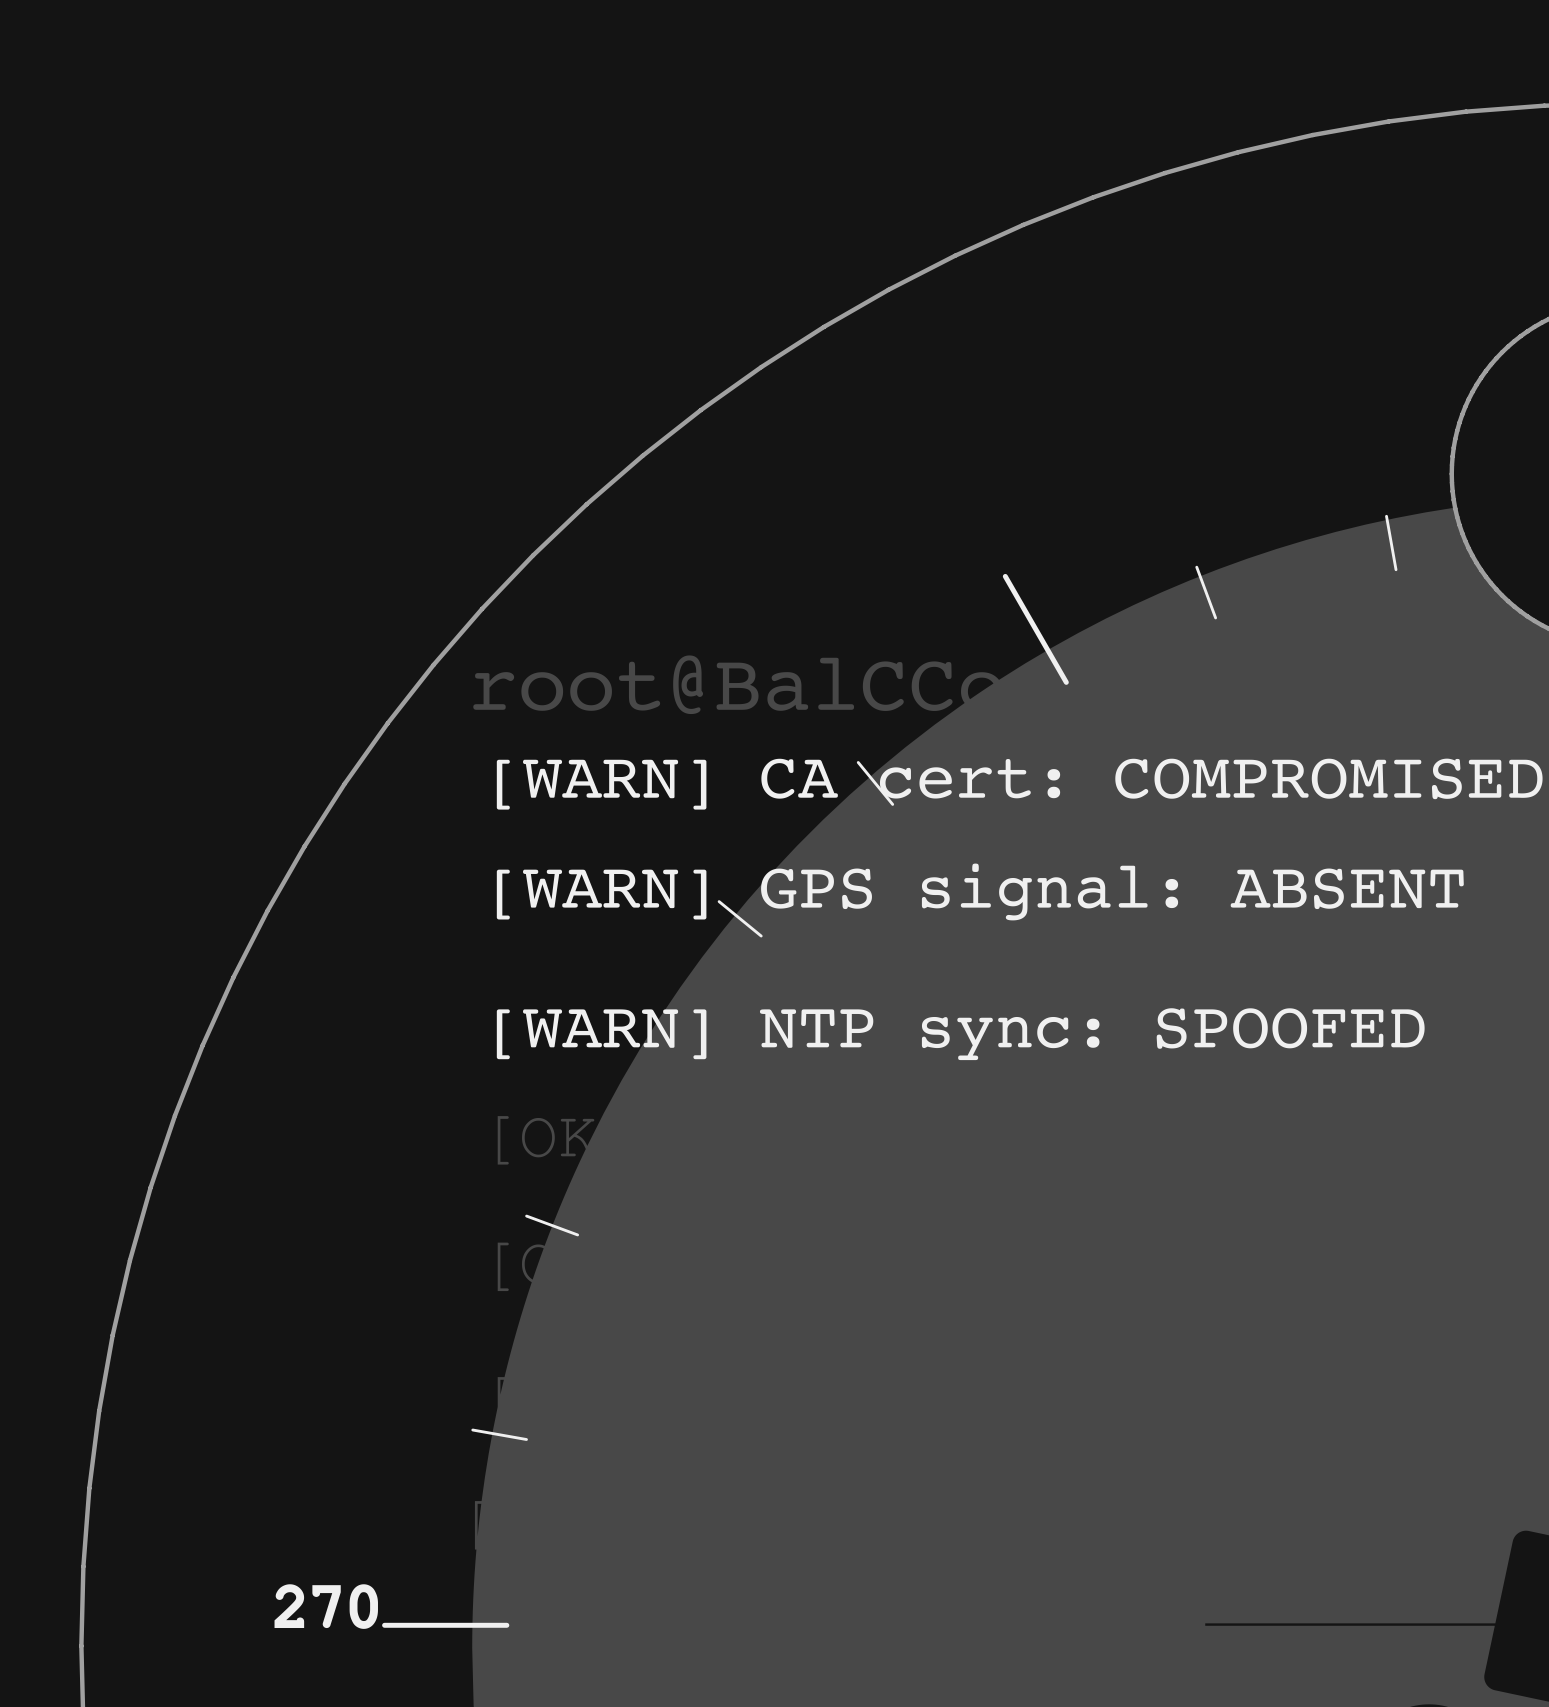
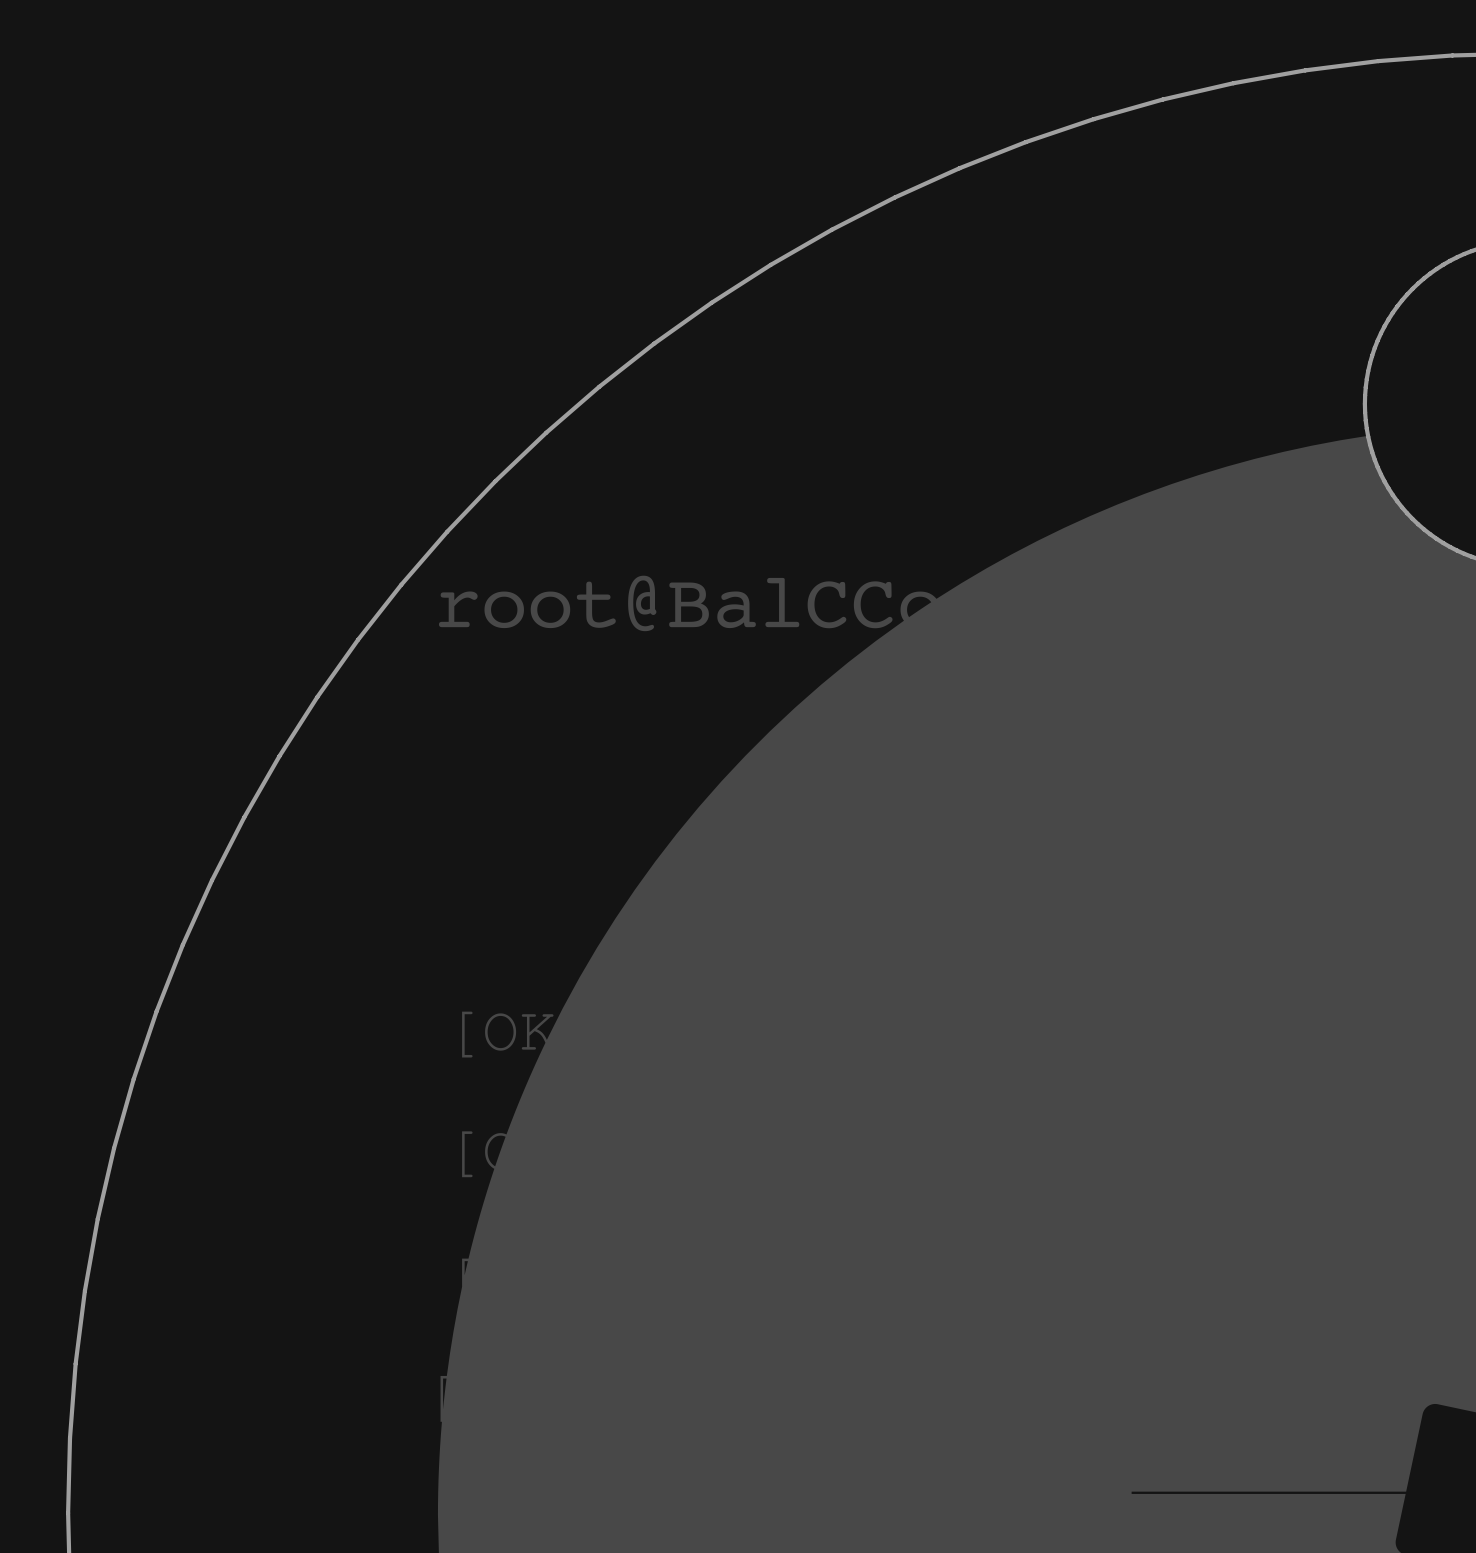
line: (1386, 516) (1396, 569) -> none
line: (1196, 567) (1215, 617) -> none
line: (1005, 576) (1066, 682) -> none
drawing: [761, 758, 1061, 799] -> none
drawing: [1115, 758, 1543, 800] -> none
drawing: [496, 759, 707, 810] -> none
line: (858, 762) (892, 804) -> none
drawing: [761, 863, 1464, 921] -> none
drawing: [496, 869, 707, 920] -> none
line: (719, 901) (761, 936) -> none
drawing: [1156, 1008, 1425, 1049] -> none
drawing: [496, 1009, 707, 1060] -> none
drawing: [759, 1009, 1100, 1061] -> none
line: (526, 1216) (577, 1234) -> none
line: (472, 1430) (526, 1439) -> none
drawing: [274, 1584, 378, 1629] -> none
line: (384, 1625) (506, 1625) -> none

